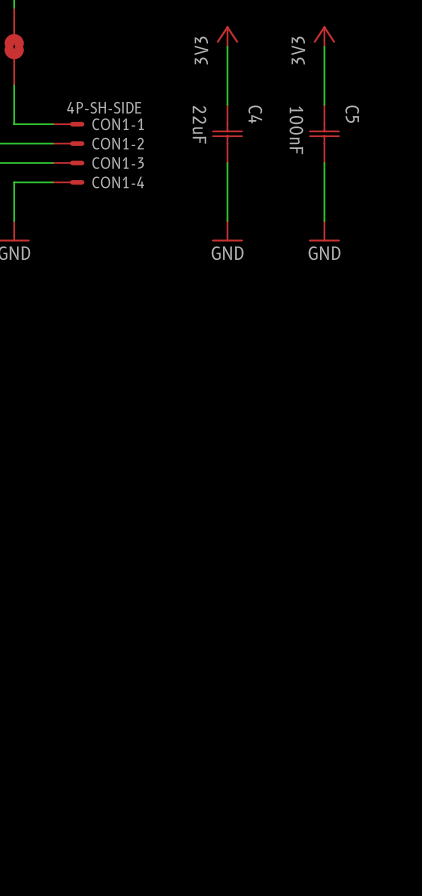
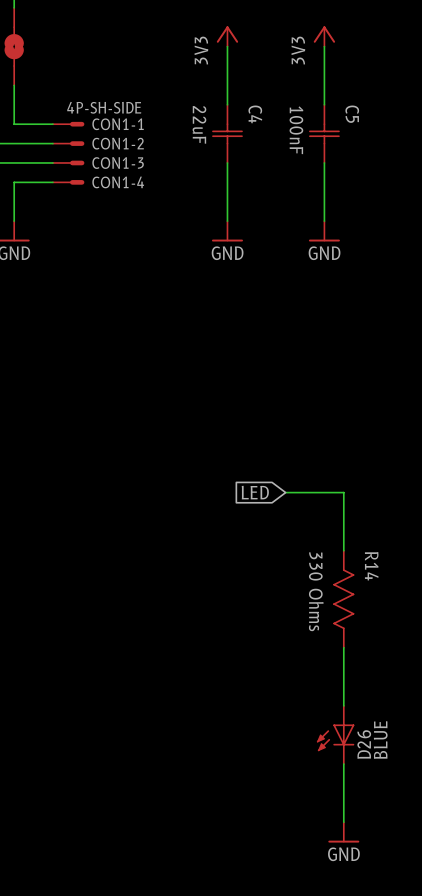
global label: none -> LED (255, 492)
wire: none -> (285, 492) (343, 492) (343, 550)
R14: none -> 330 Ohms (343, 599)
wire: none -> (343, 647) (343, 705)
D26: none -> (335, 734)
wire: none -> (343, 764) (343, 822)
power symbol: none -> GND (343, 832)

